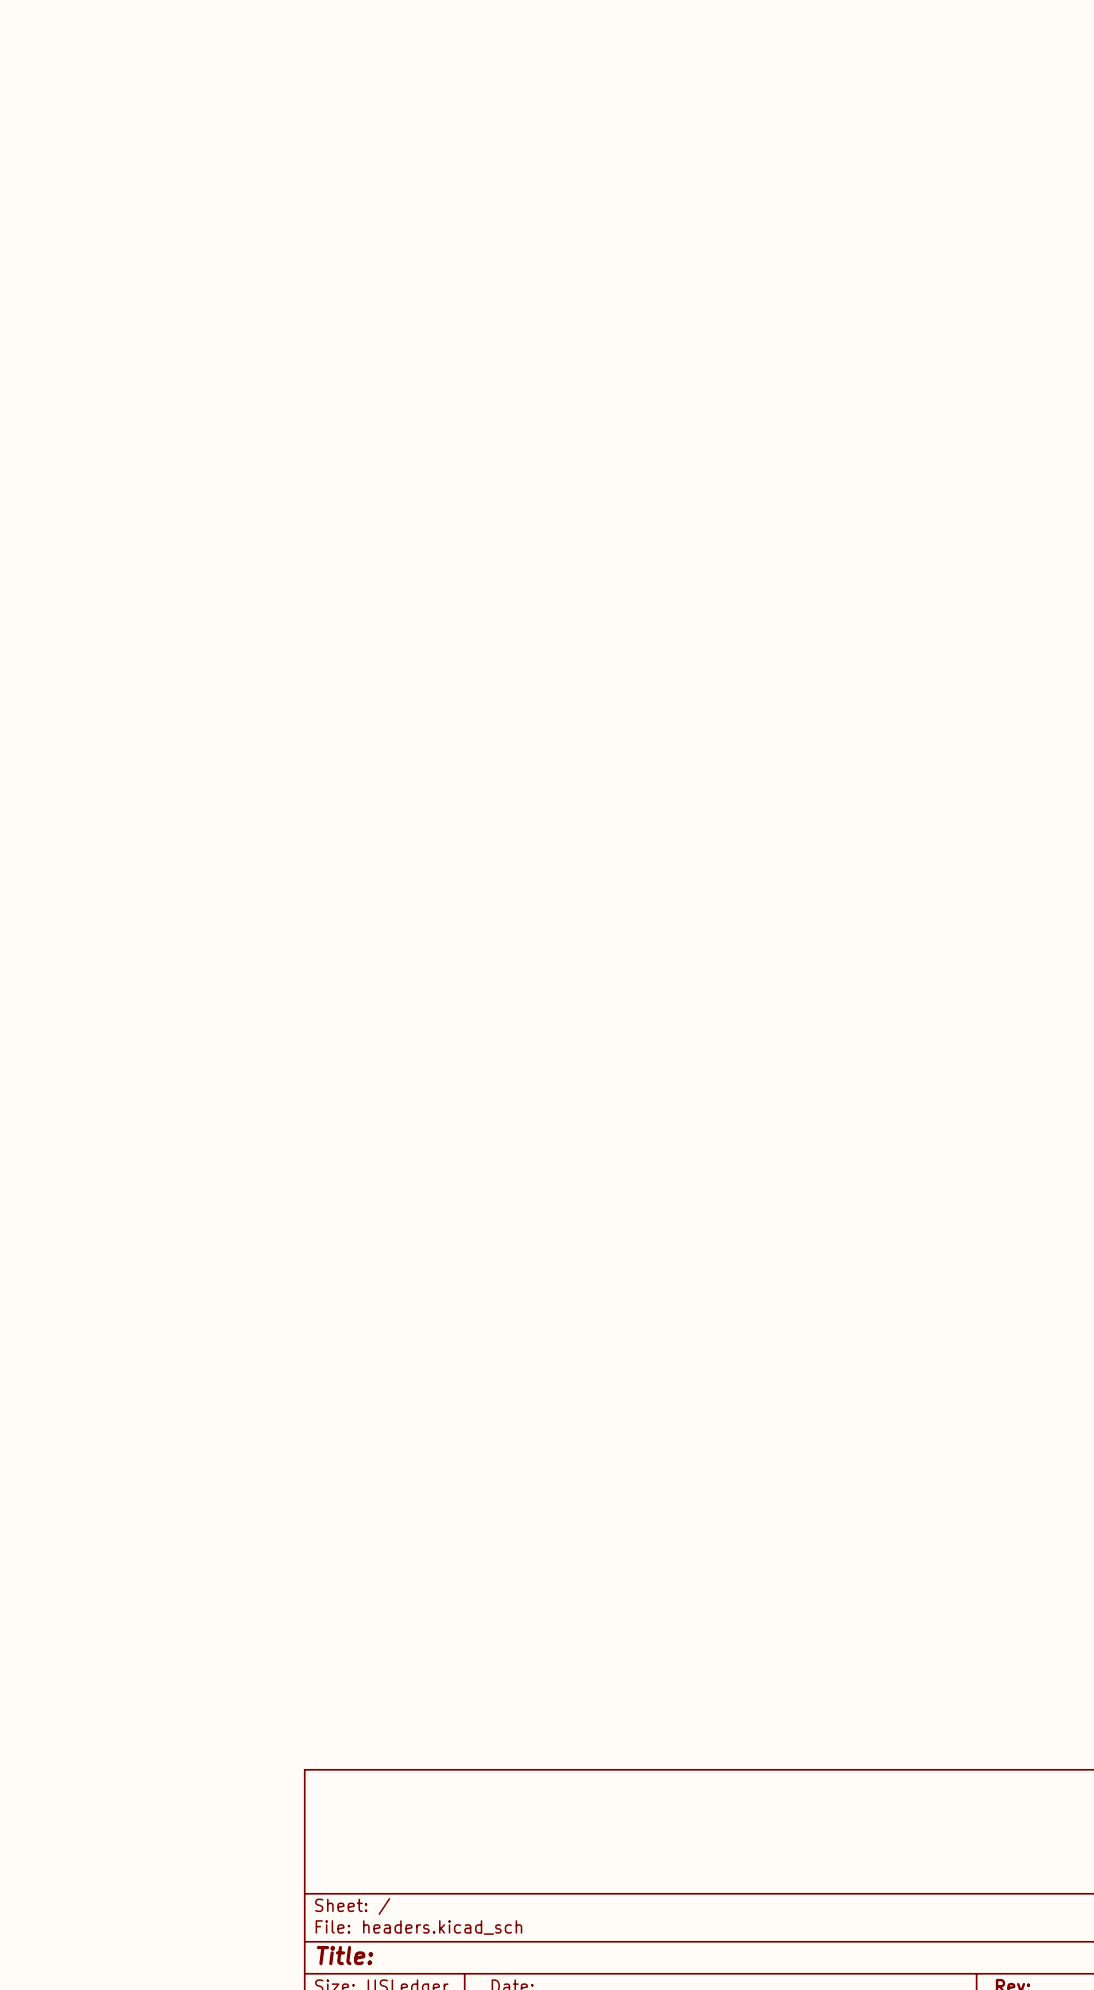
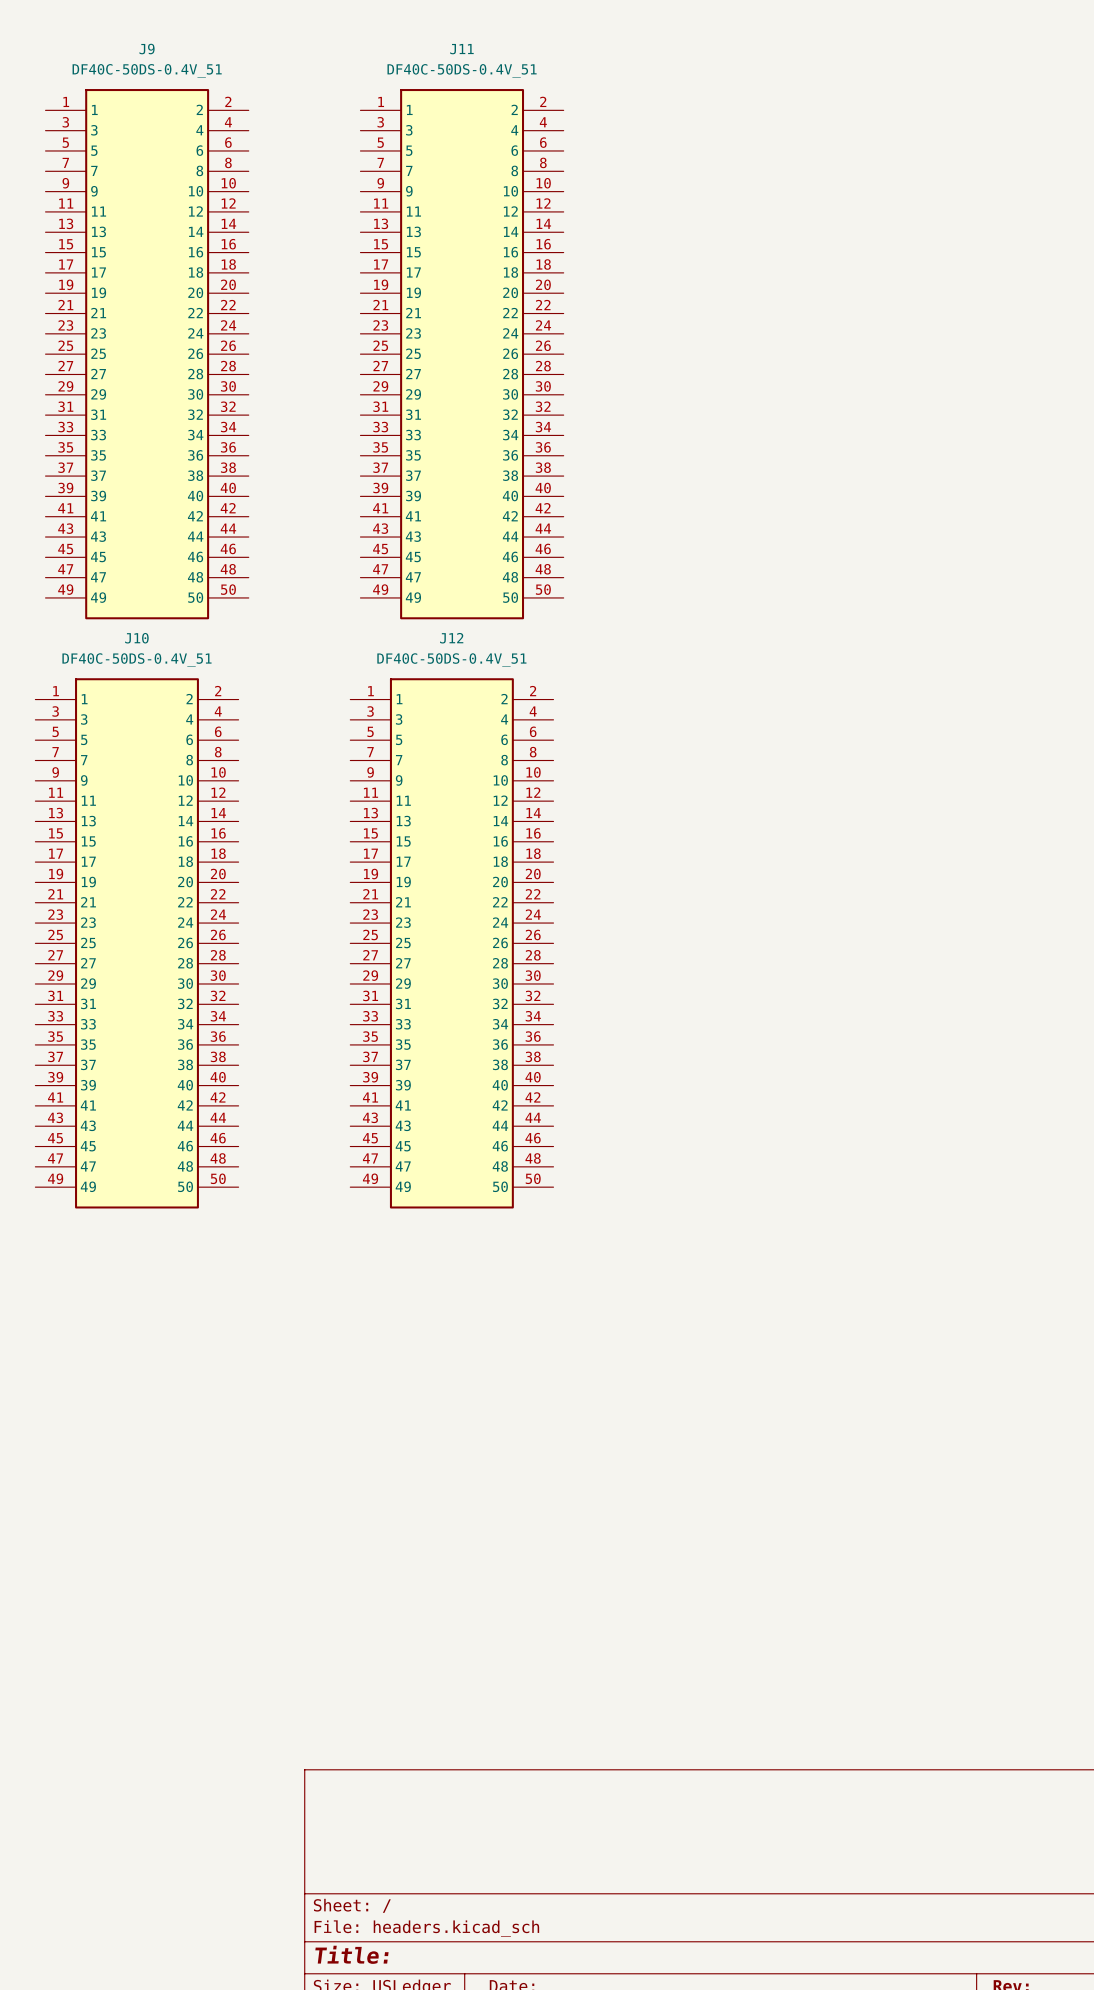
J9: none -> DF40C-50DS-0.4V_51 (147, 354)
J11: none -> DF40C-50DS-0.4V_51 (462, 354)
J10: none -> DF40C-50DS-0.4V_51 (136, 943)
J12: none -> DF40C-50DS-0.4V_51 (451, 943)

